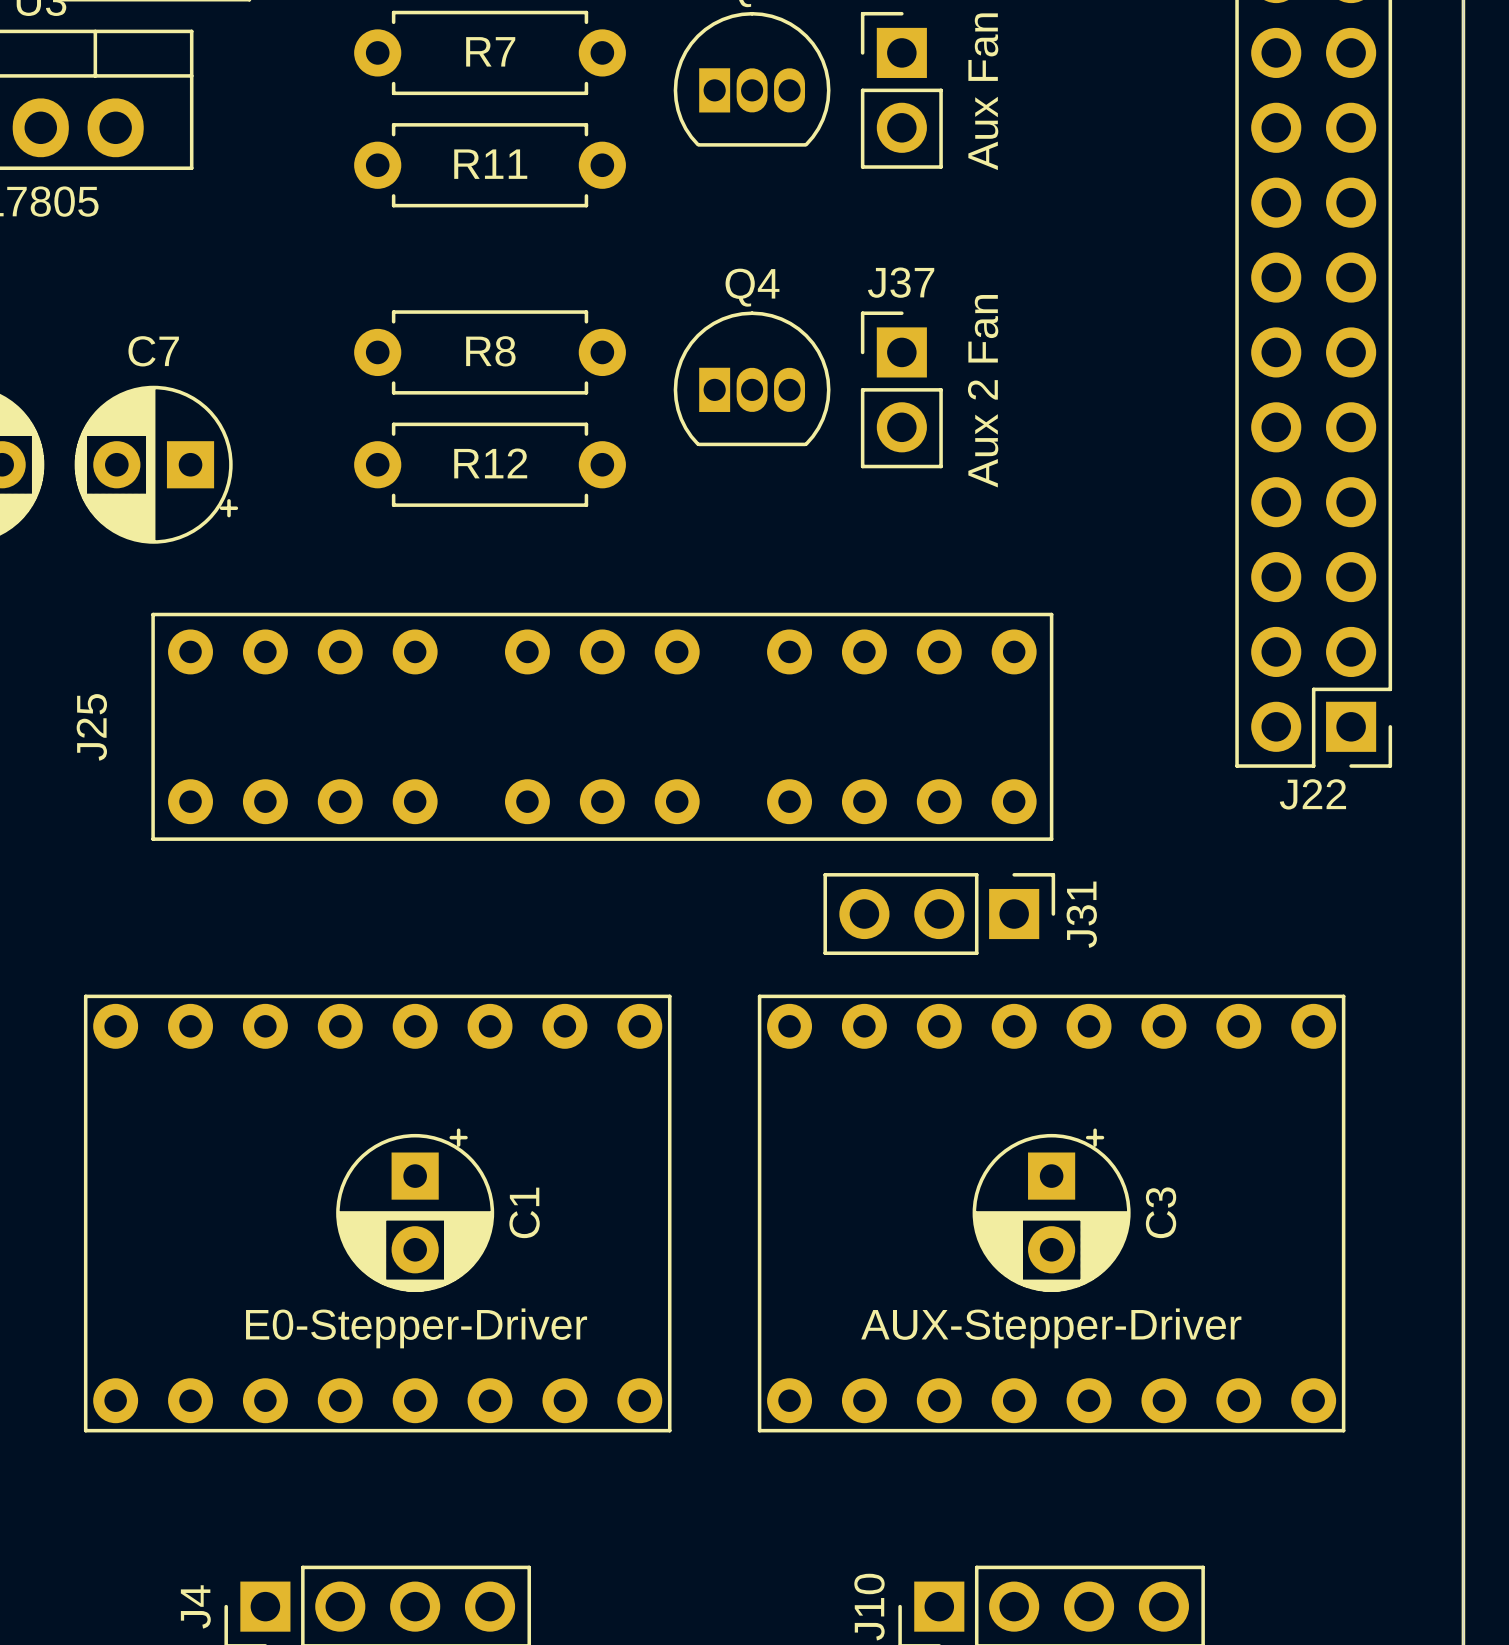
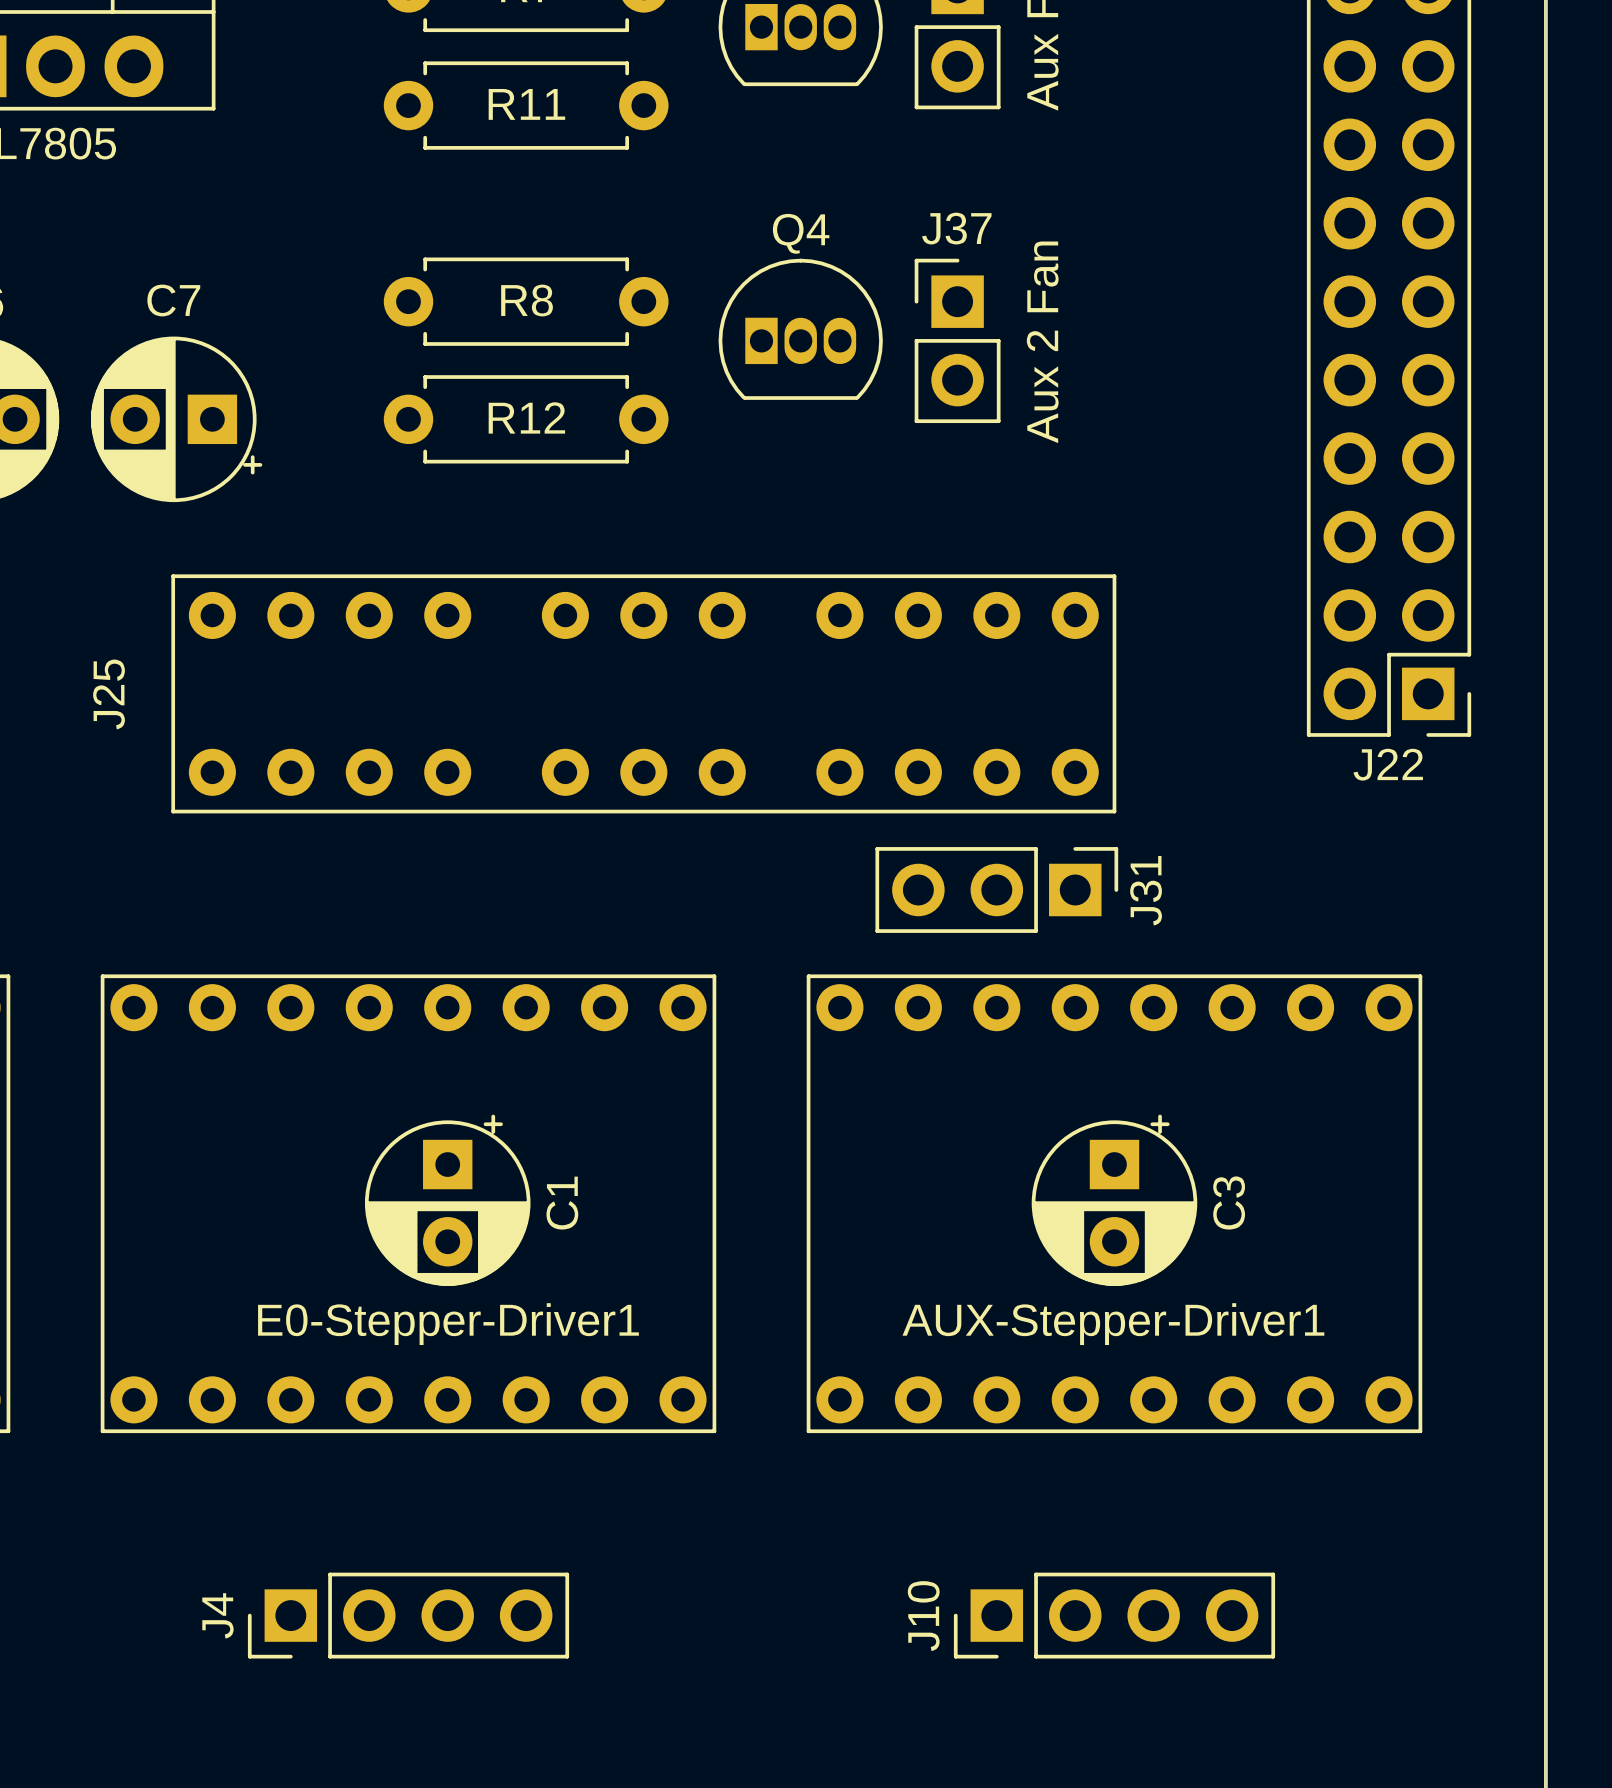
E0-Stepper-Driver name: E0-Stepper-Driver (416, 1328) -> E0-Stepper-Driver1 (448, 1324)
AUX-Stepper-Driver name: AUX-Stepper-Driver (1051, 1328) -> AUX-Stepper-Driver1 (1113, 1324)

